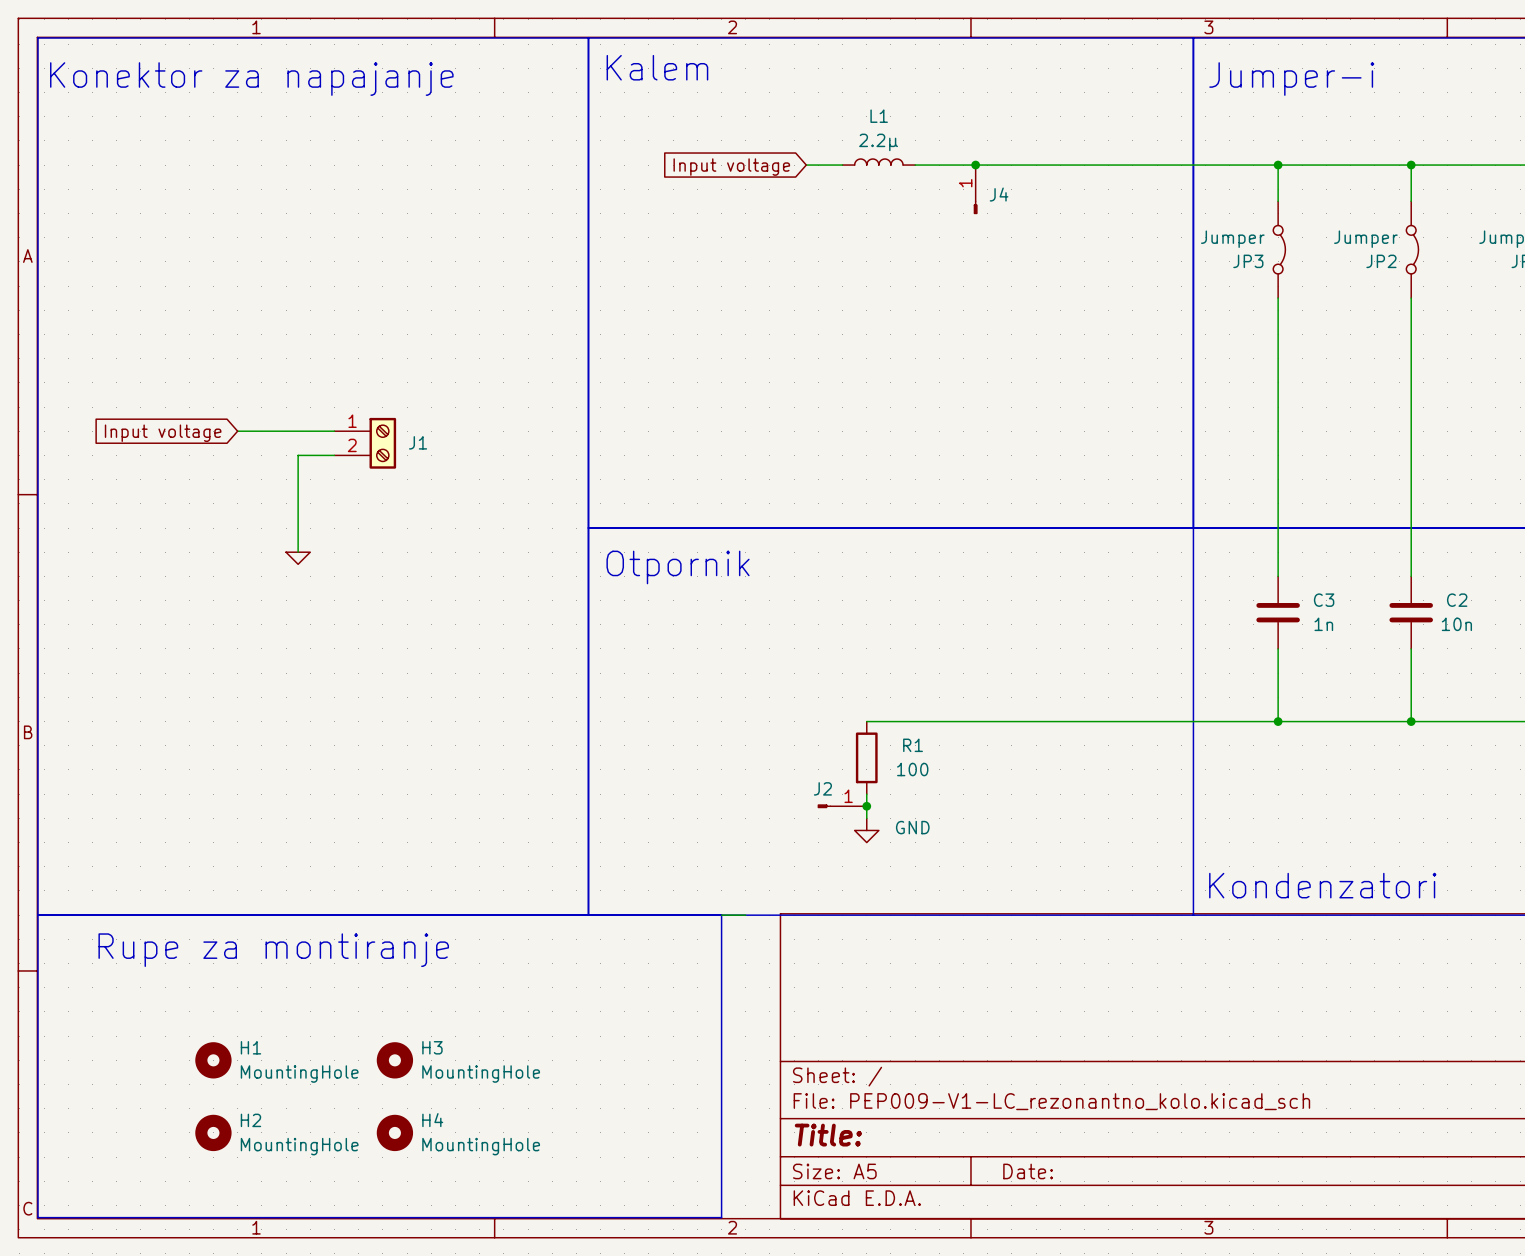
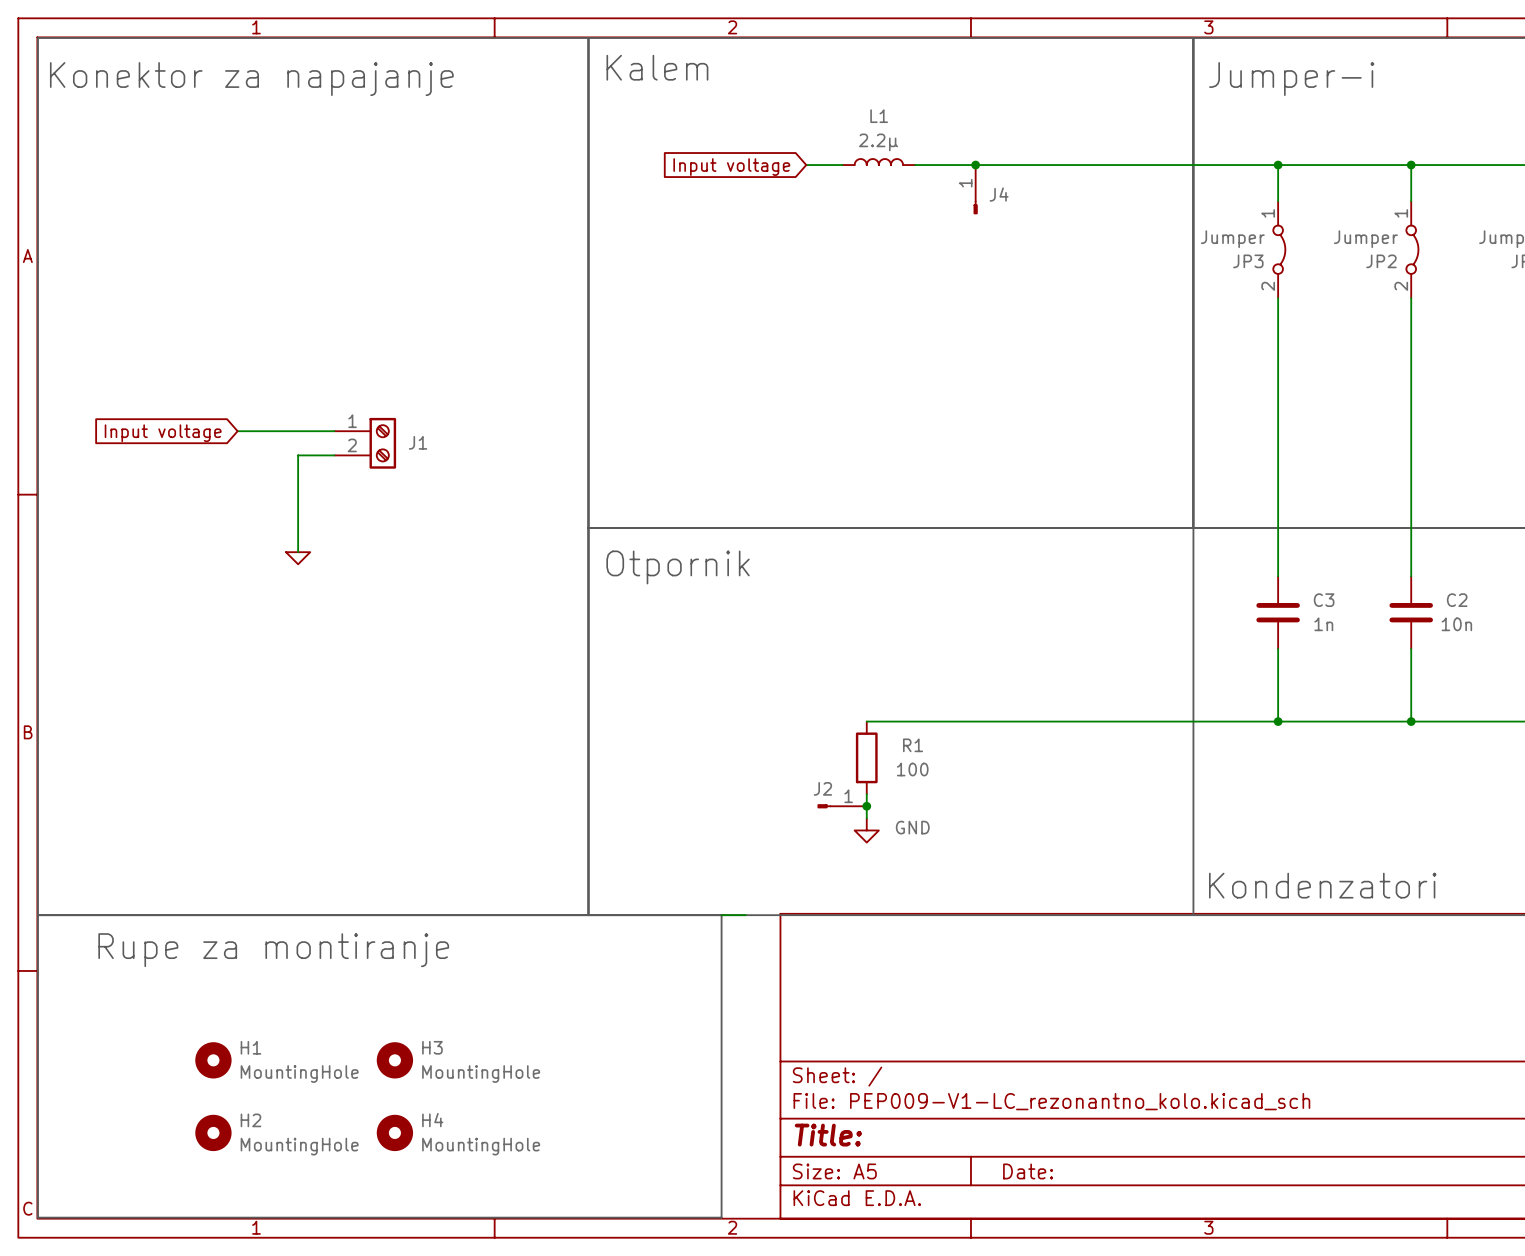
JP3 pin number: none -> 1 (1268, 213)
JP2 pin number: none -> 1 (1401, 213)
JP3 pin number: none -> 2 (1268, 286)
JP2 pin number: none -> 2 (1401, 286)

